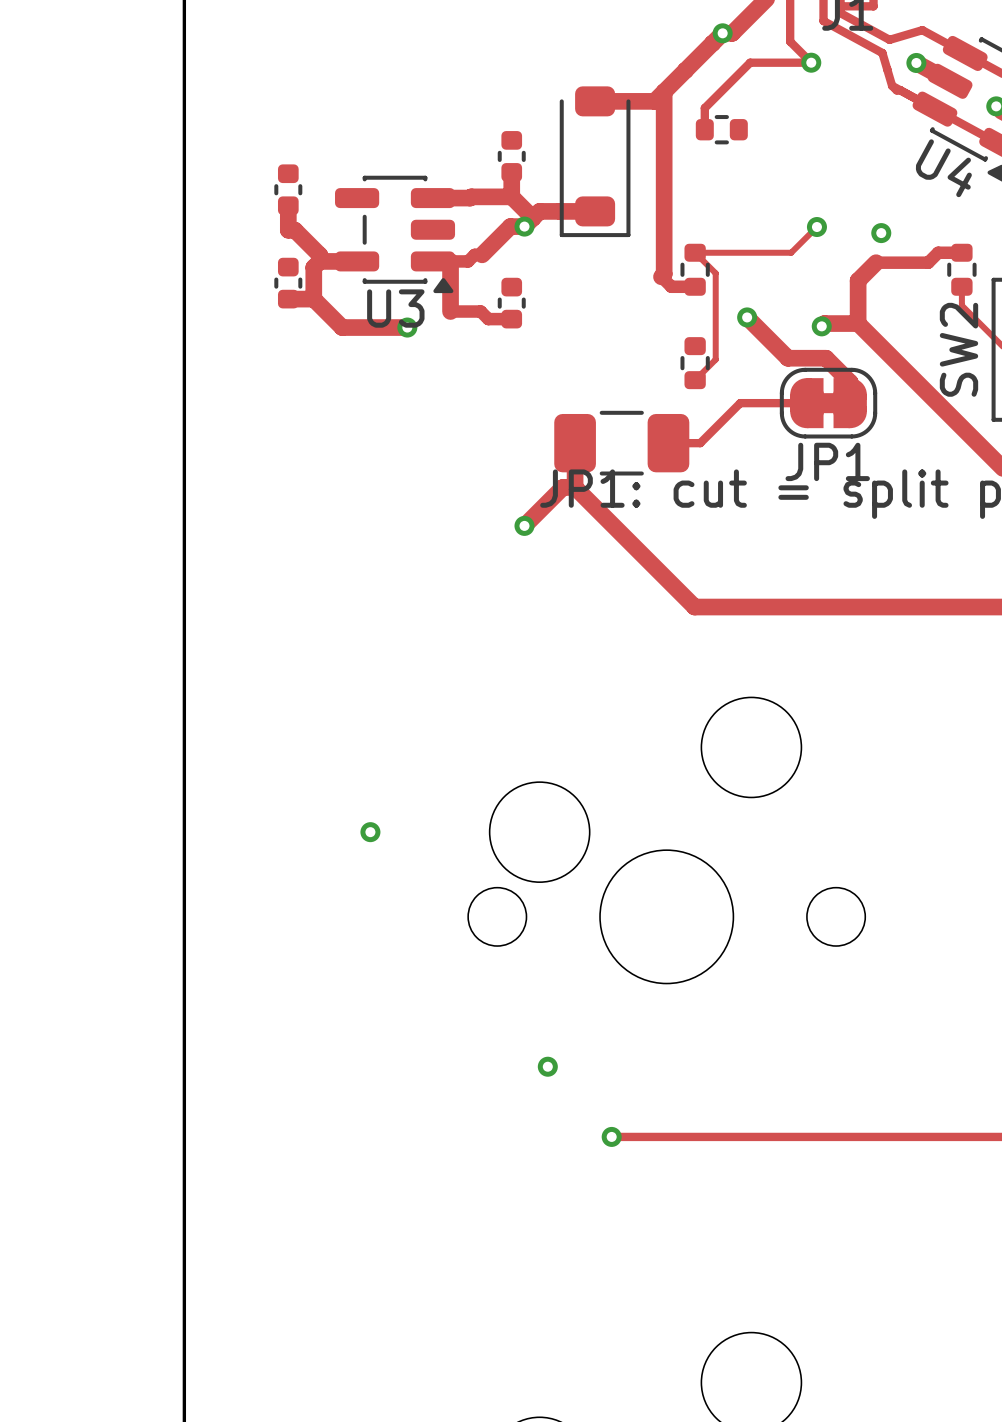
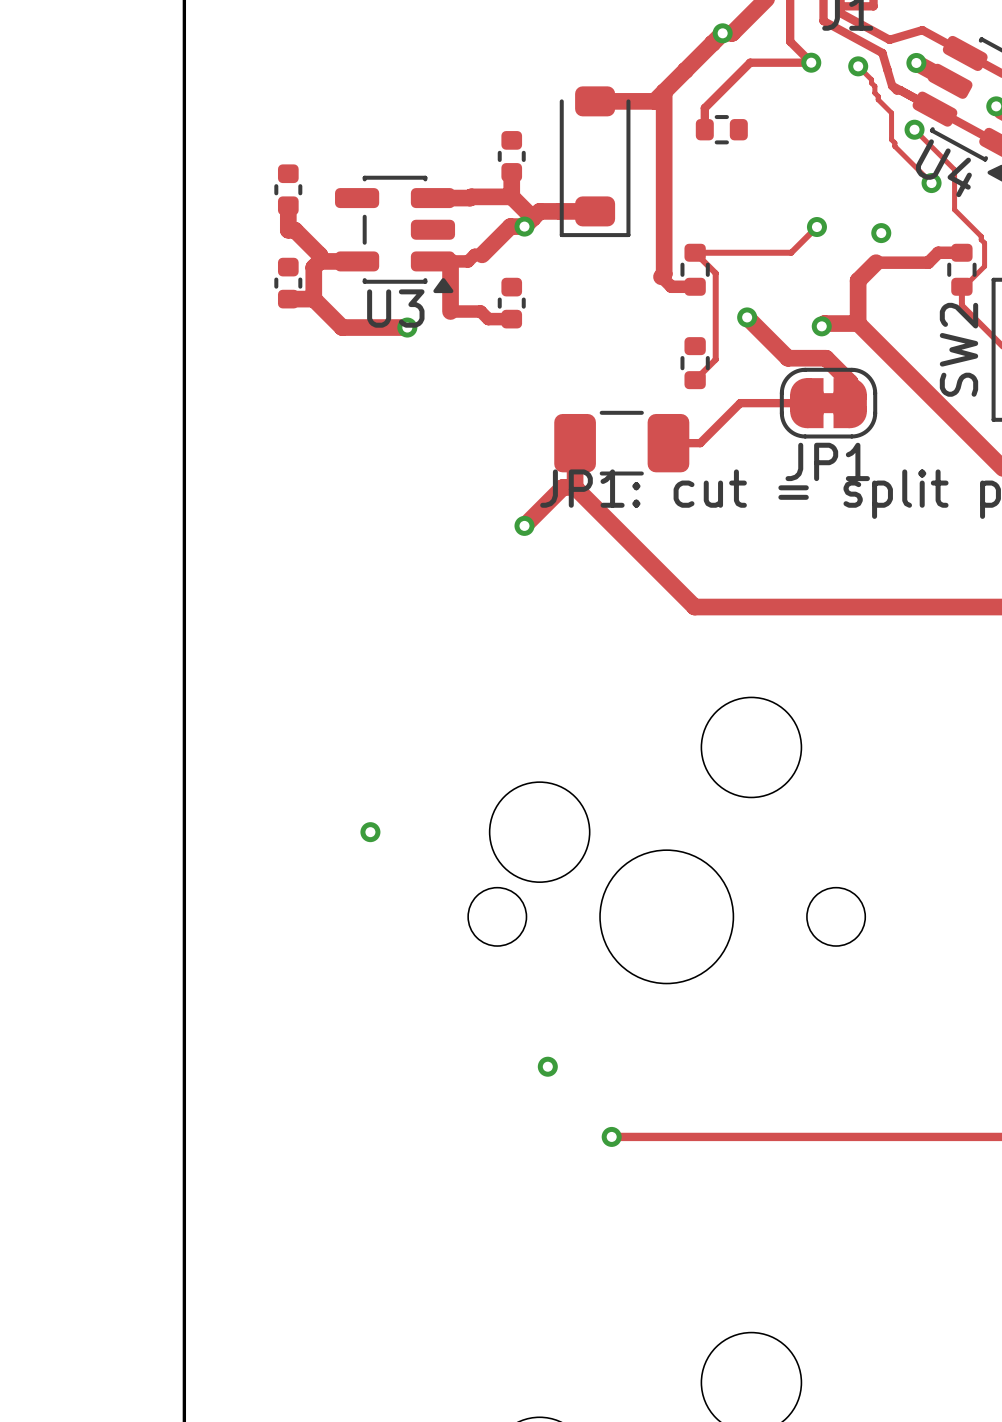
track: none -> (858, 66) (871, 79) (878, 99) (891, 113) (891, 139) (894, 146) (931, 183)
via: none -> (858, 66)
track: none -> (914, 129) (954, 169) (954, 209) (981, 236) (984, 243) (984, 266) (971, 279)
via: none -> (914, 129)
via: none -> (931, 183)

